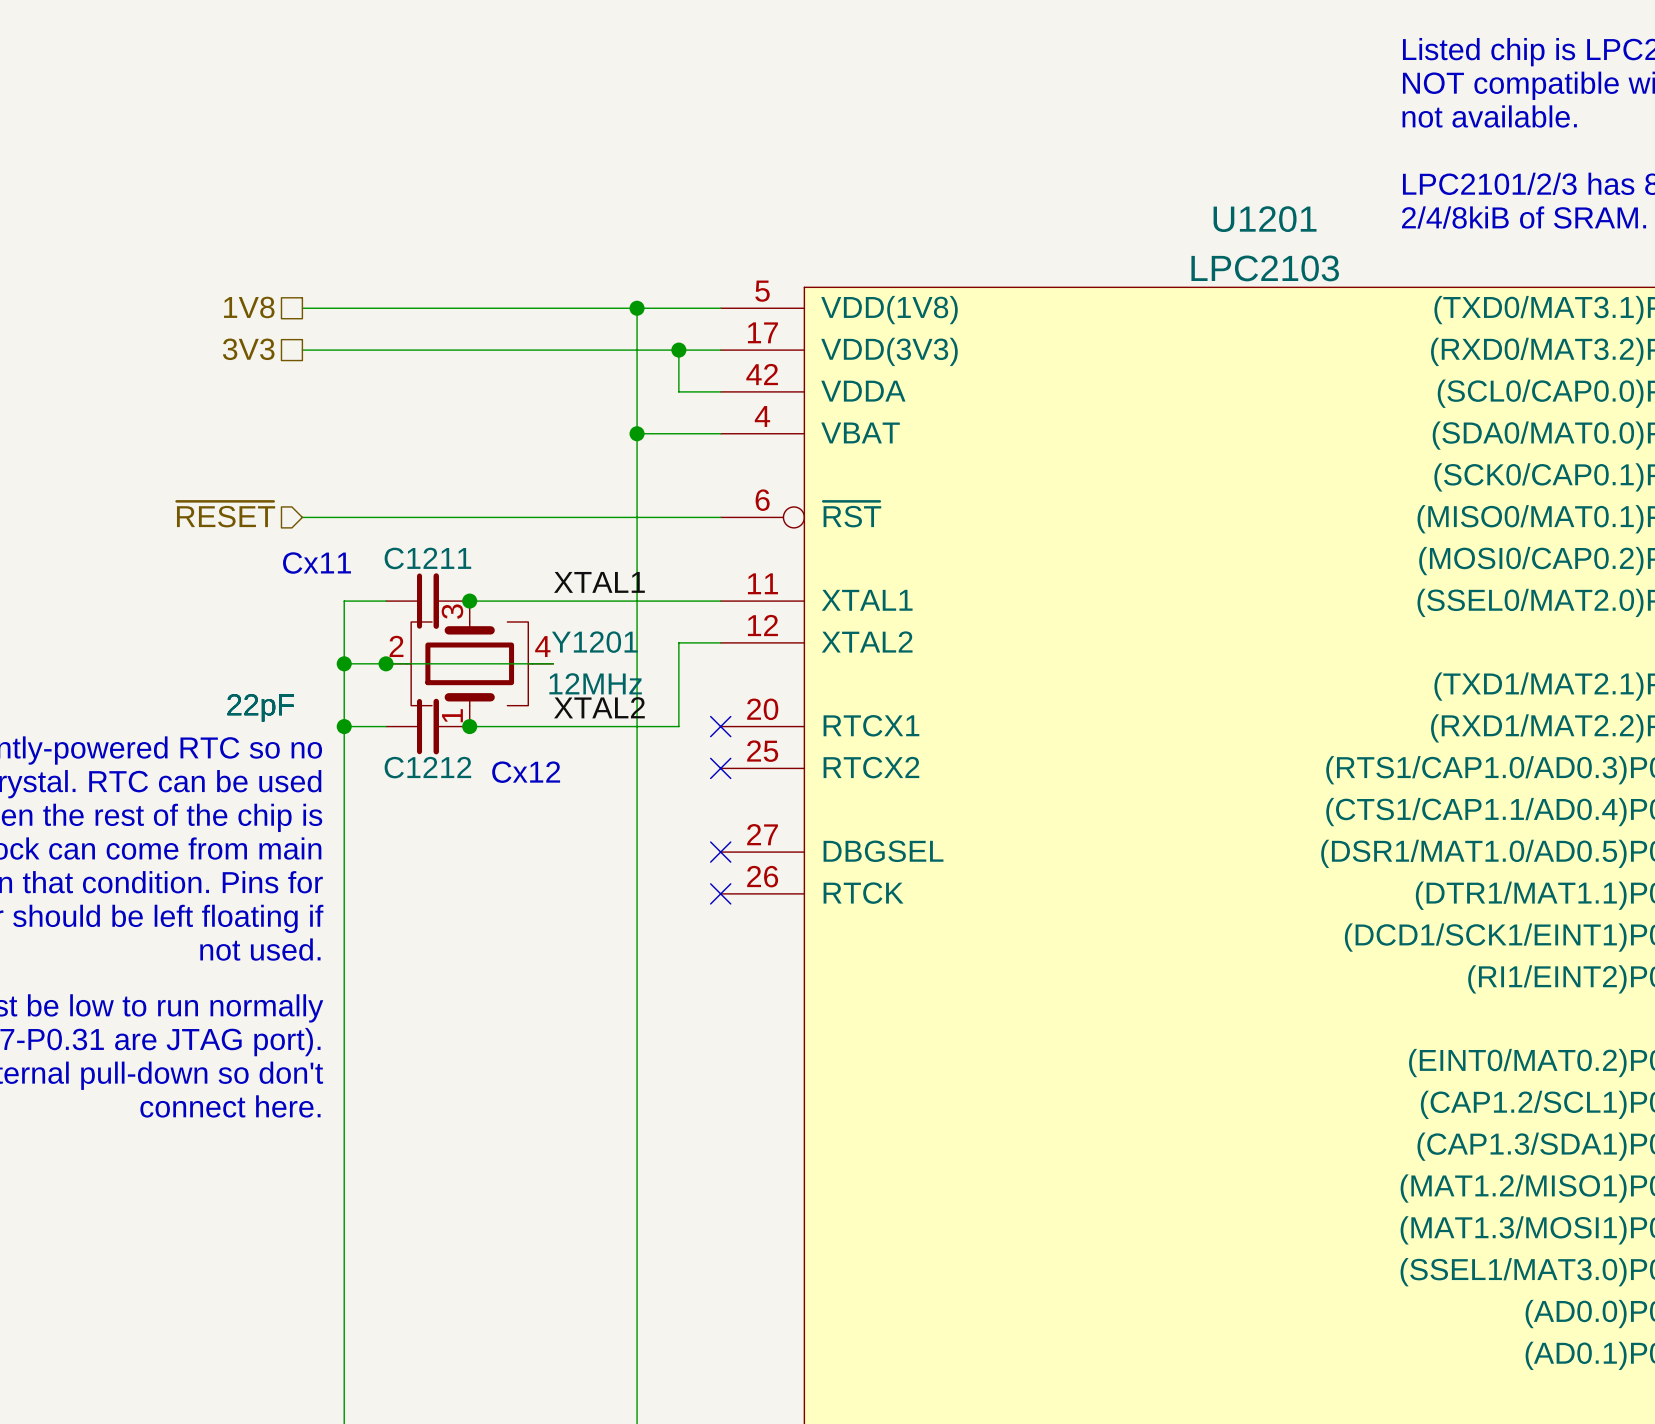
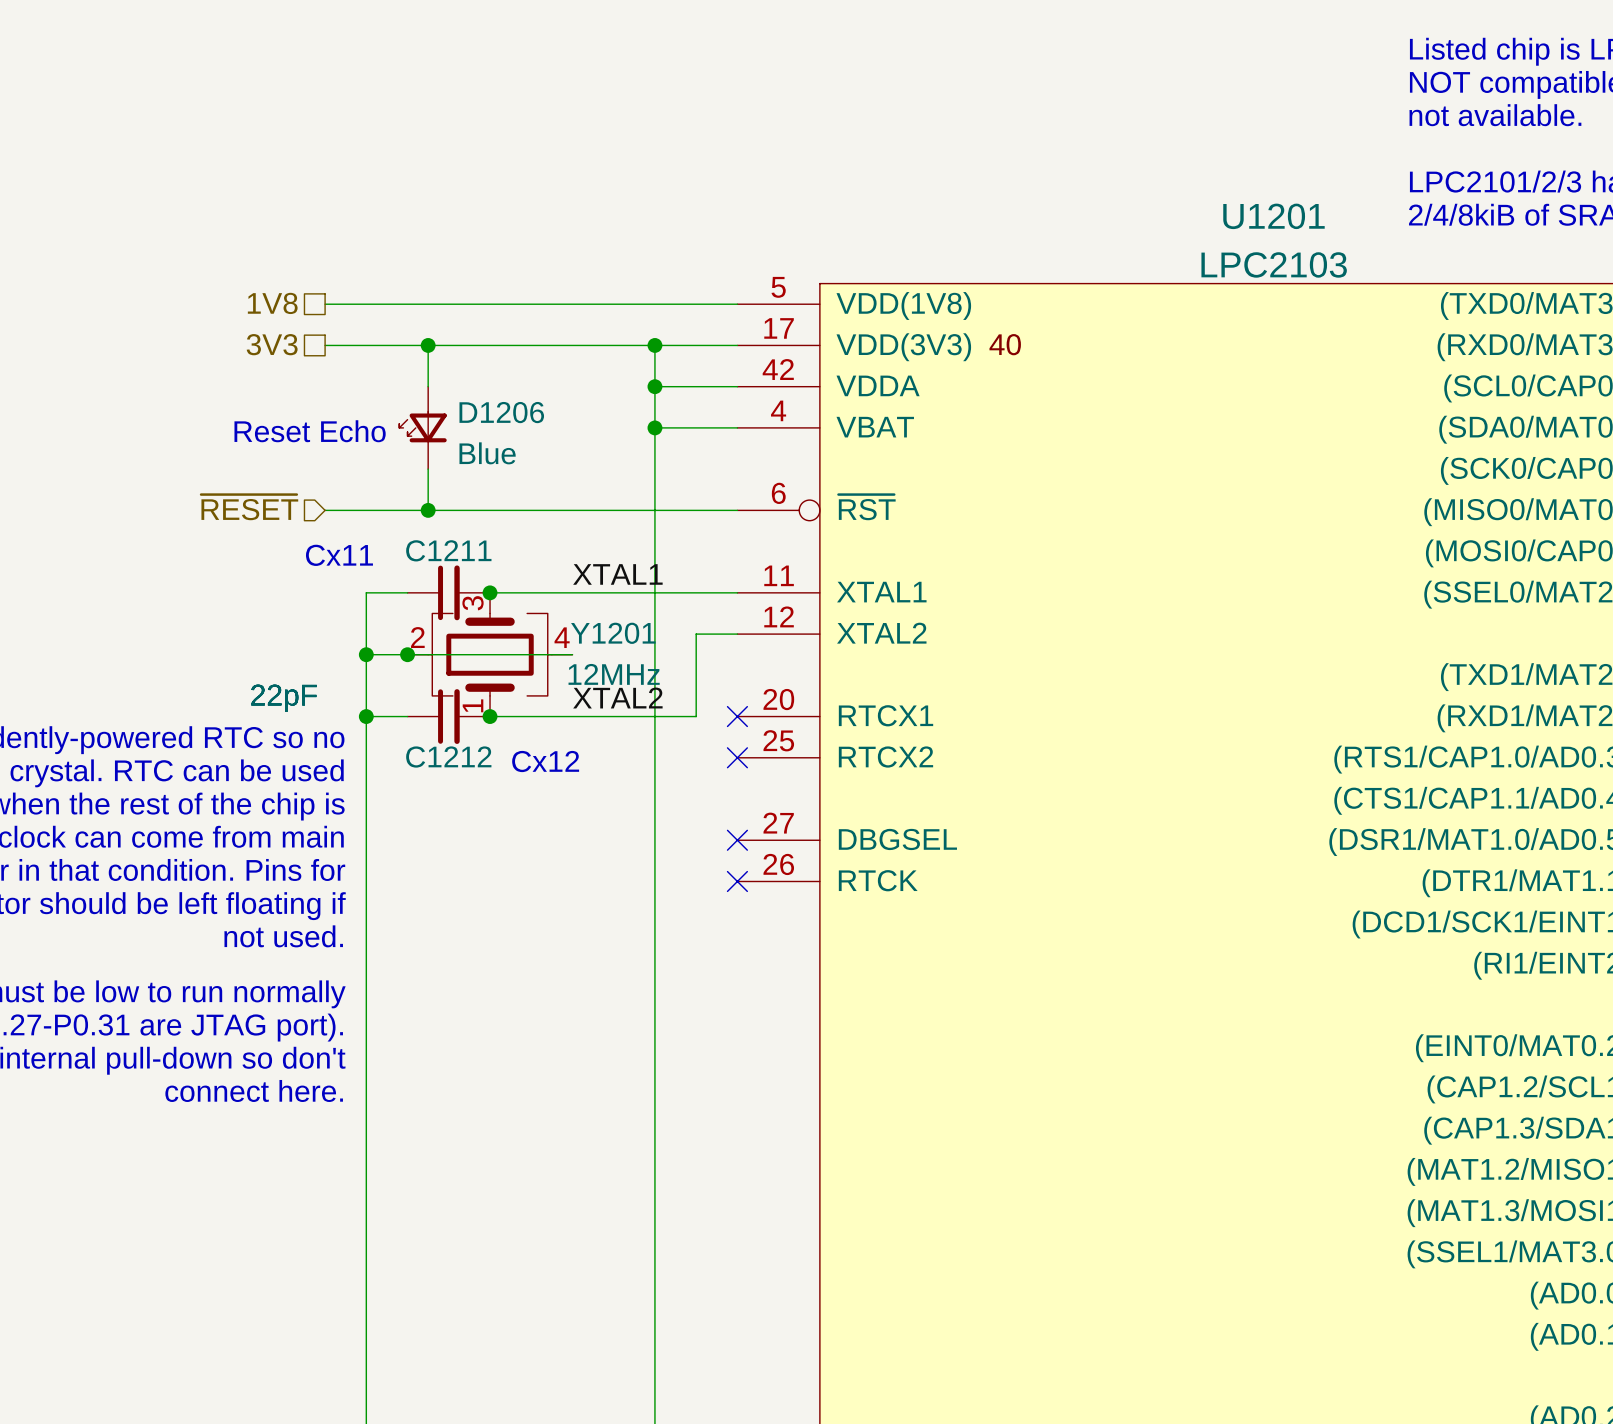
wire: (637, 308) (637, 350) -> (428, 345) (428, 386)
junction: (637, 308) -> none
U1201 text: none -> 40 (1005, 344)
junction: none -> (428, 345)
junction: none -> (654, 345)
wire: (678, 350) (678, 391) -> (654, 386) (696, 386)
junction: (678, 350) -> none
junction: none -> (654, 386)
D1206: none -> Blue (423, 427)
text: none -> Reset Echo (310, 431)
wire: none -> (428, 469) (428, 510)
junction: none -> (428, 510)

